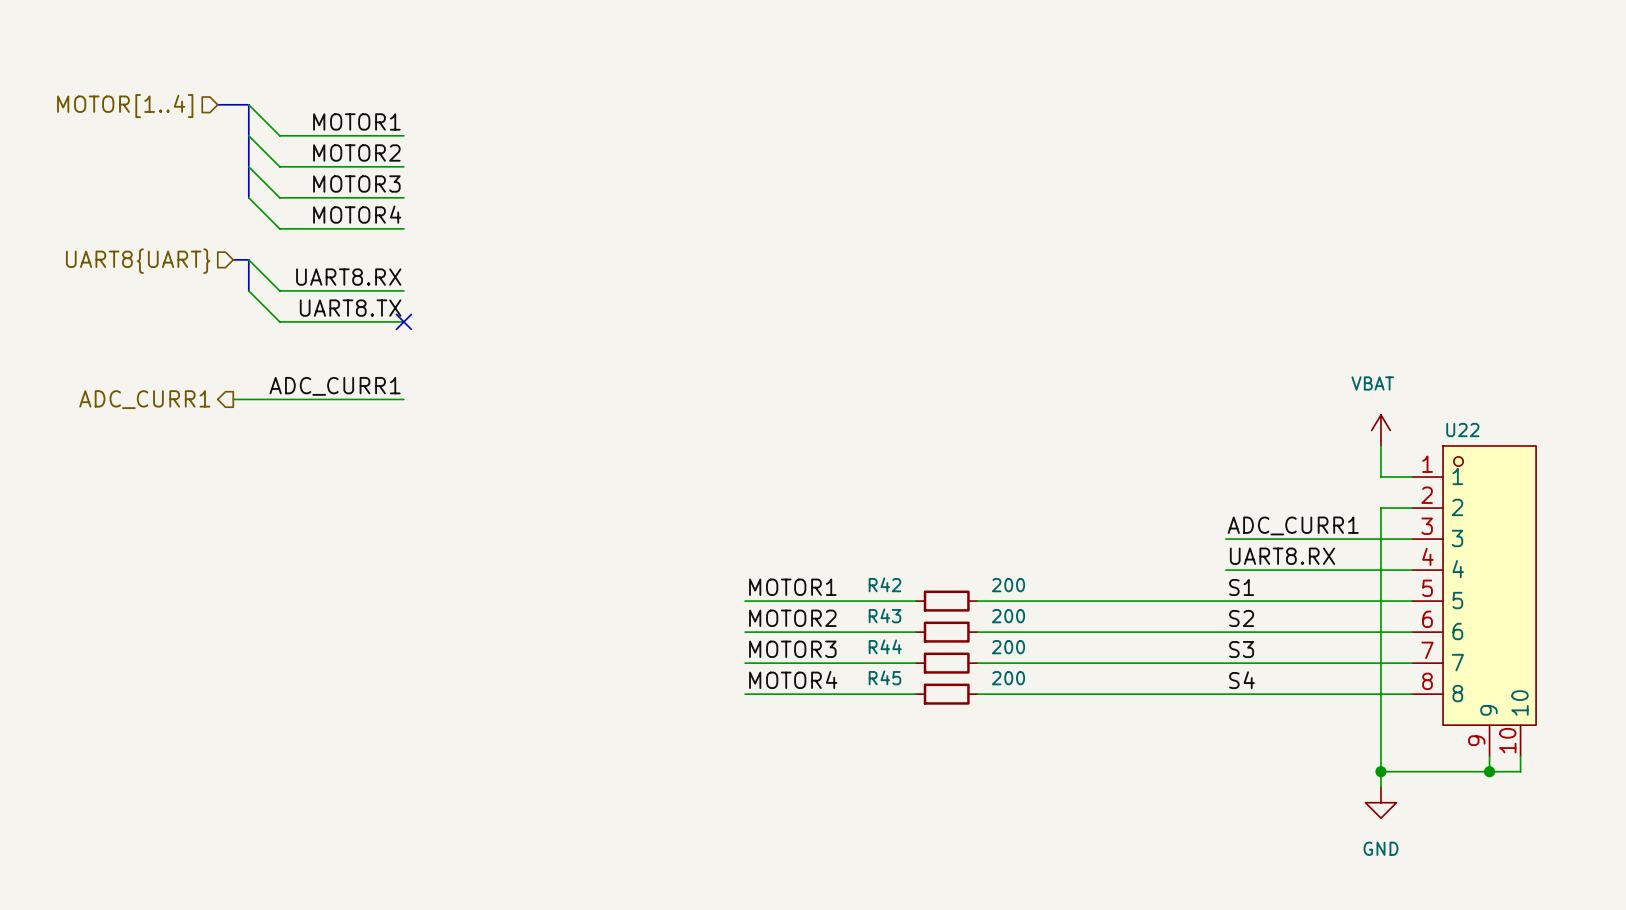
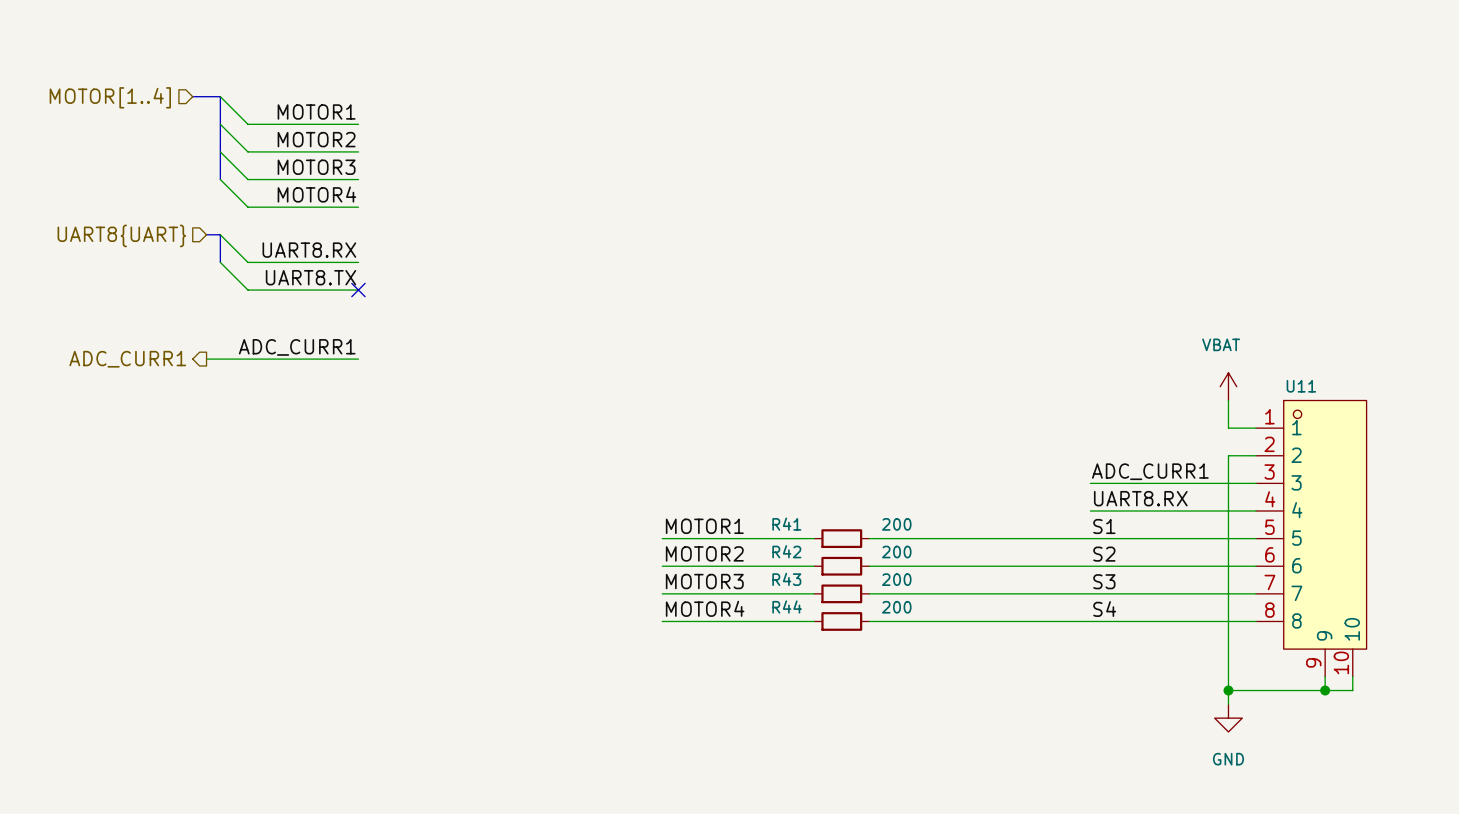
U22 name: U22 (1462, 430) -> U11 (1301, 386)
R42 name: R42 (884, 584) -> R41 (786, 524)
R43 name: R43 (884, 615) -> R42 (786, 551)
R44 name: R44 (885, 646) -> R43 (786, 579)
R45 name: R45 (884, 677) -> R44 (787, 606)

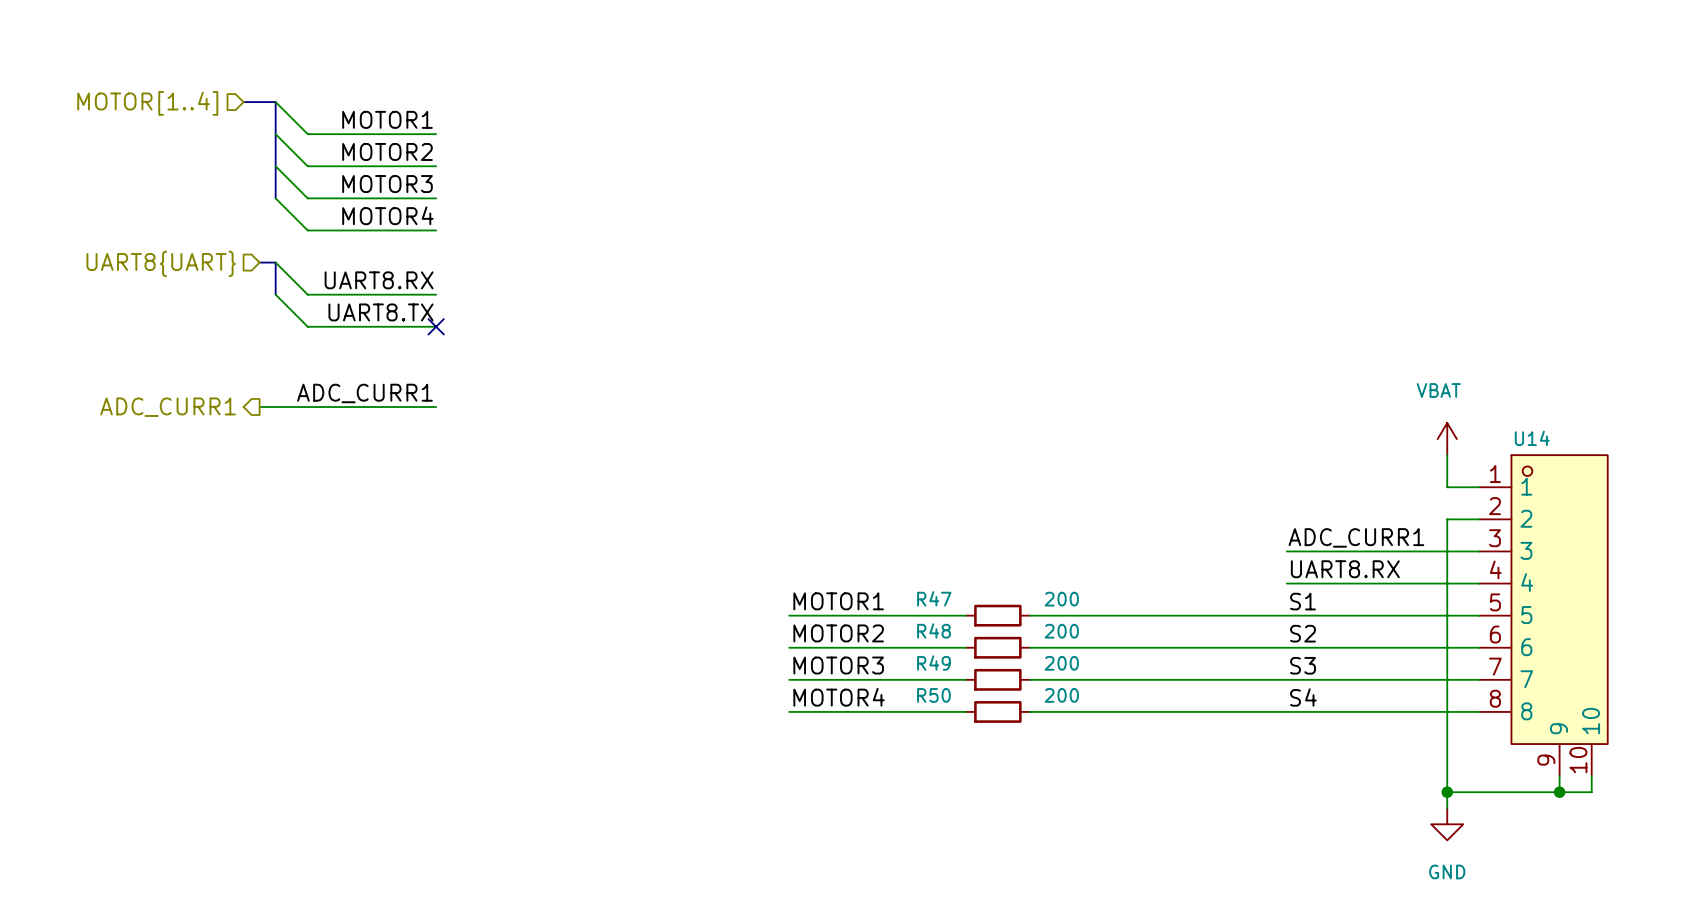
U11 name: U11 (1301, 386) -> U14 (1532, 438)
R41 name: R41 (786, 524) -> R47 (934, 598)
R42 name: R42 (786, 551) -> R48 (933, 630)
R43 name: R43 (786, 579) -> R49 (933, 663)
R44 name: R44 (787, 606) -> R50 (933, 695)

